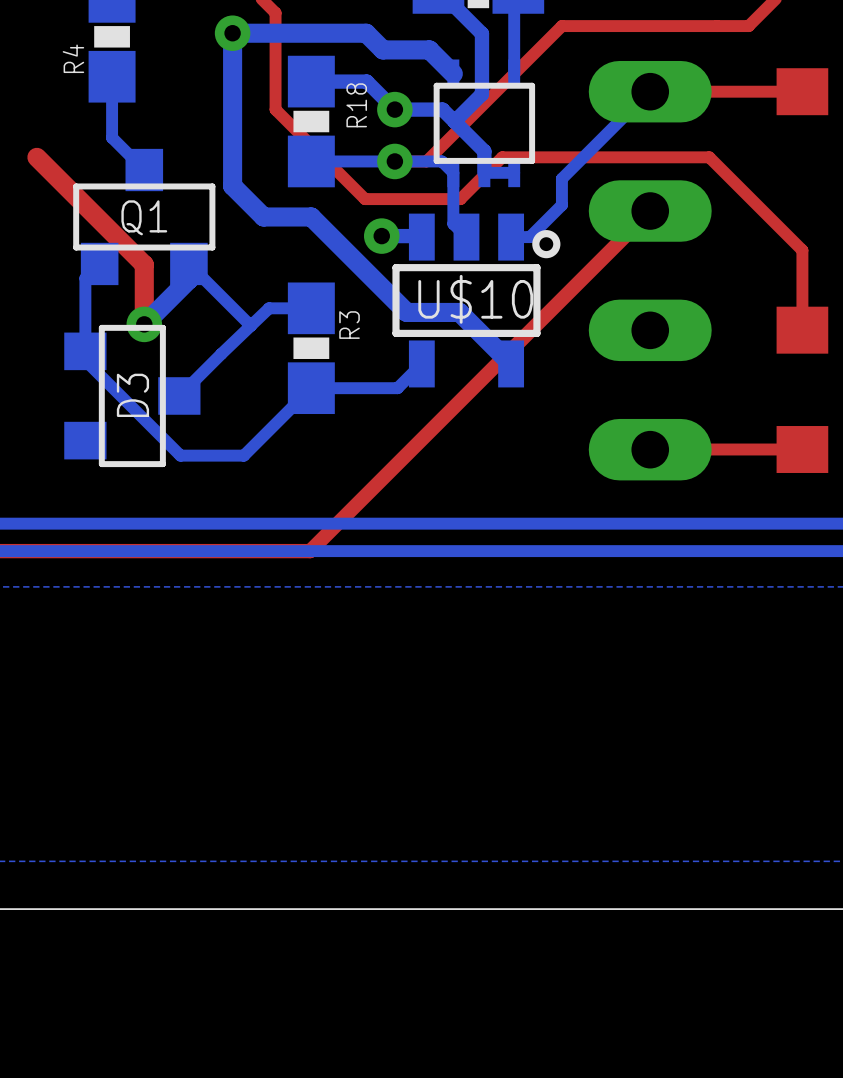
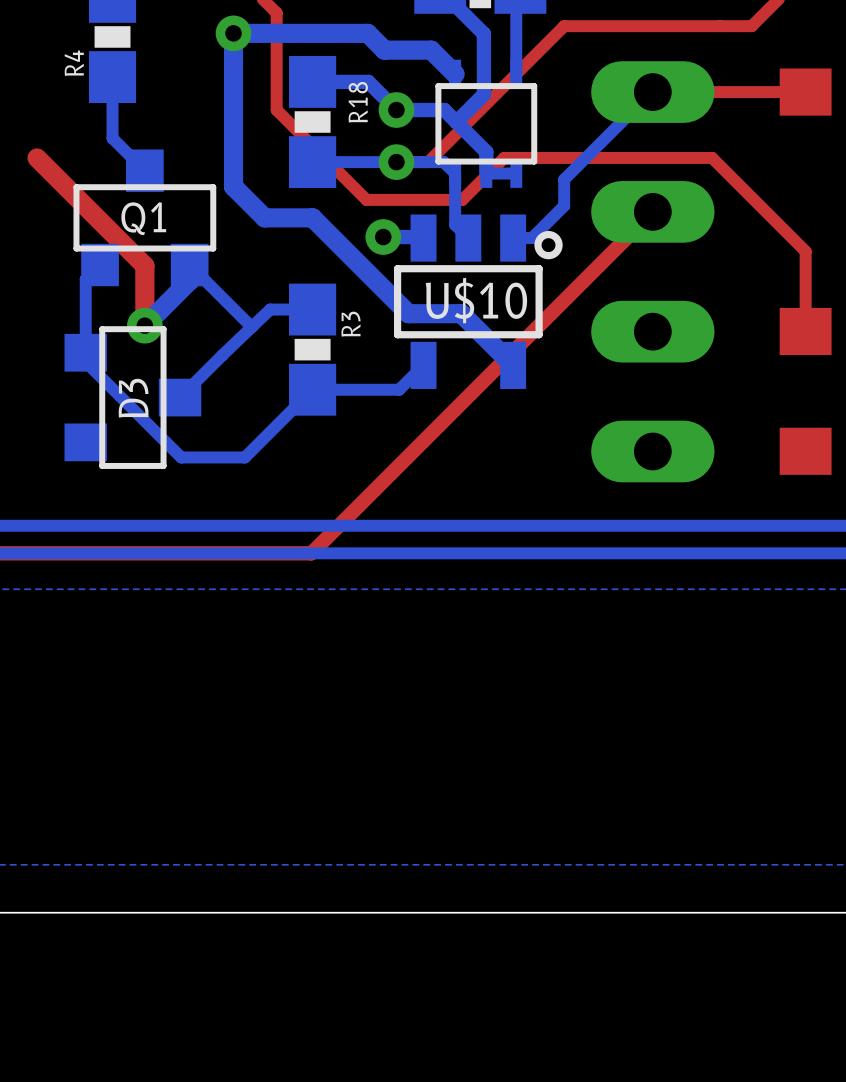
top track: (802, 449) (650, 449) -> none

